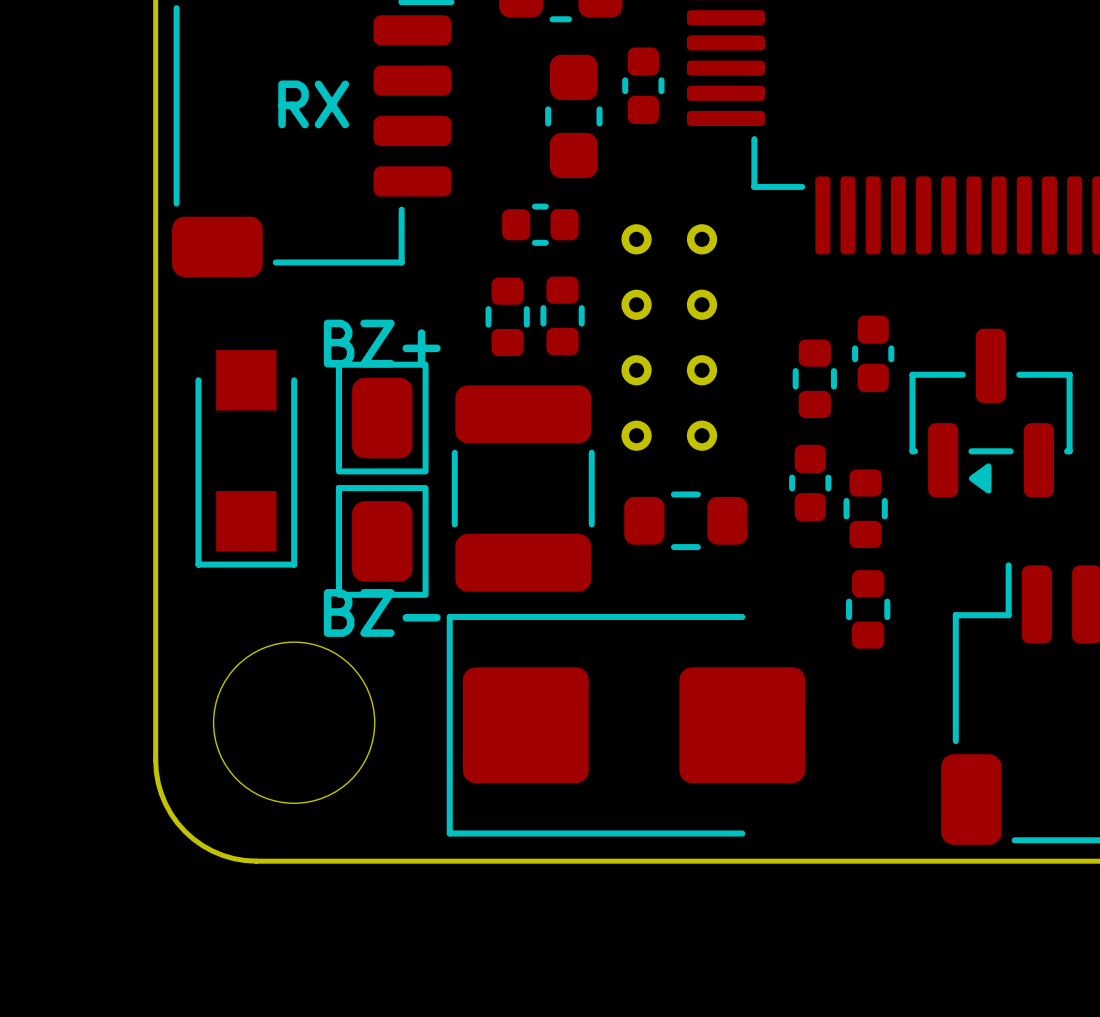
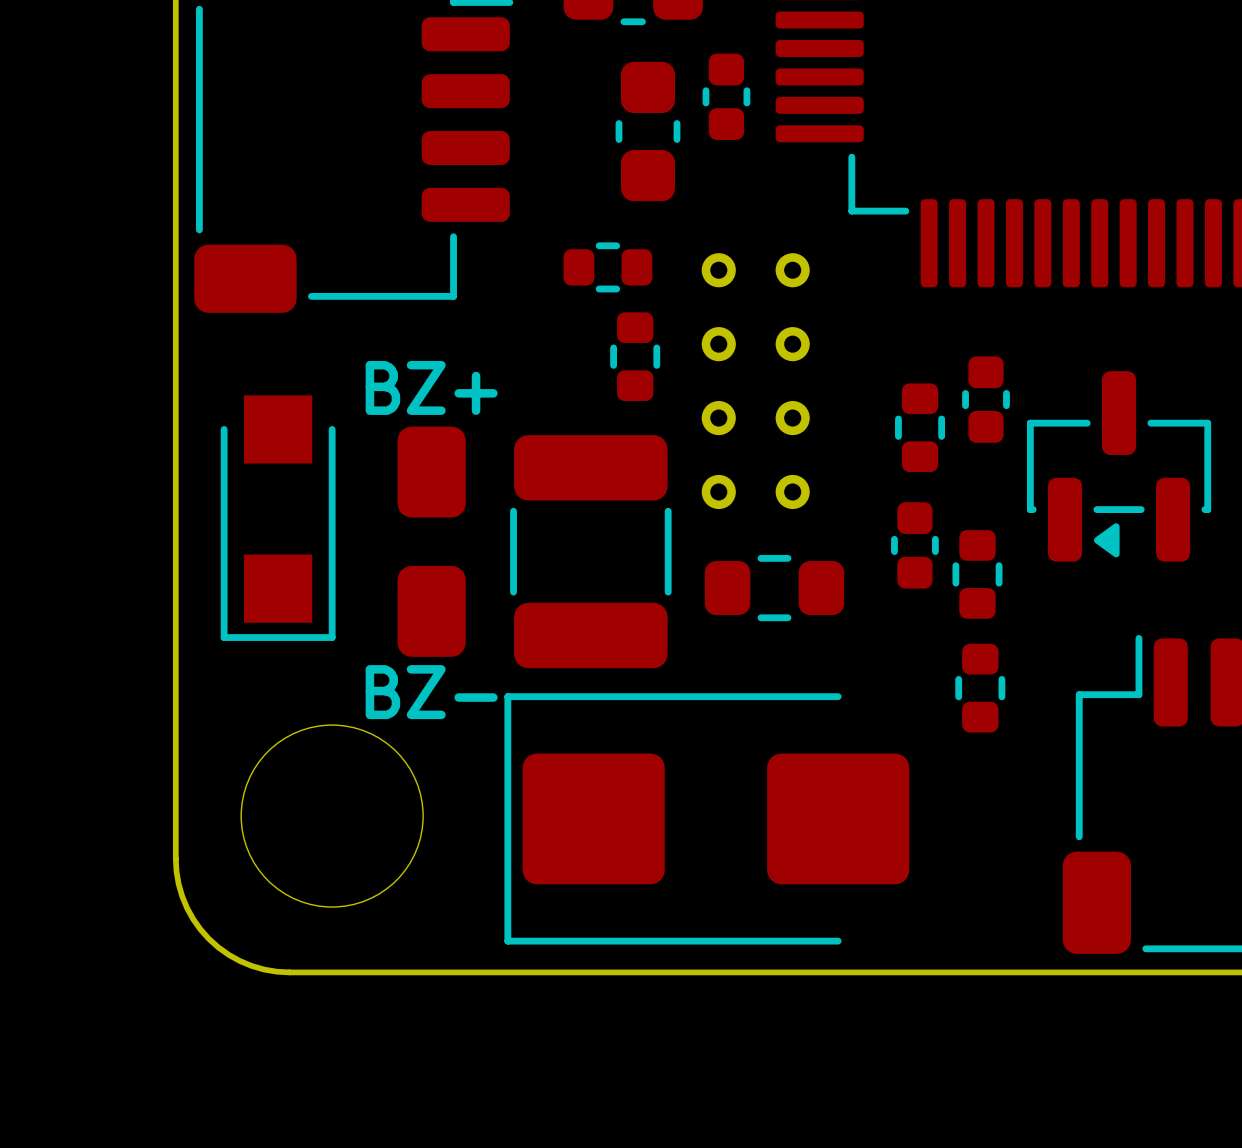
text: RX (313, 104) -> none
part footprint: [502, 203, 579, 246] -> [563, 242, 653, 293]
part: (507, 316) -> none
part footprint: [335, 361, 429, 475] -> [397, 426, 466, 518]
part footprint: [335, 485, 429, 598] -> [397, 565, 466, 657]

